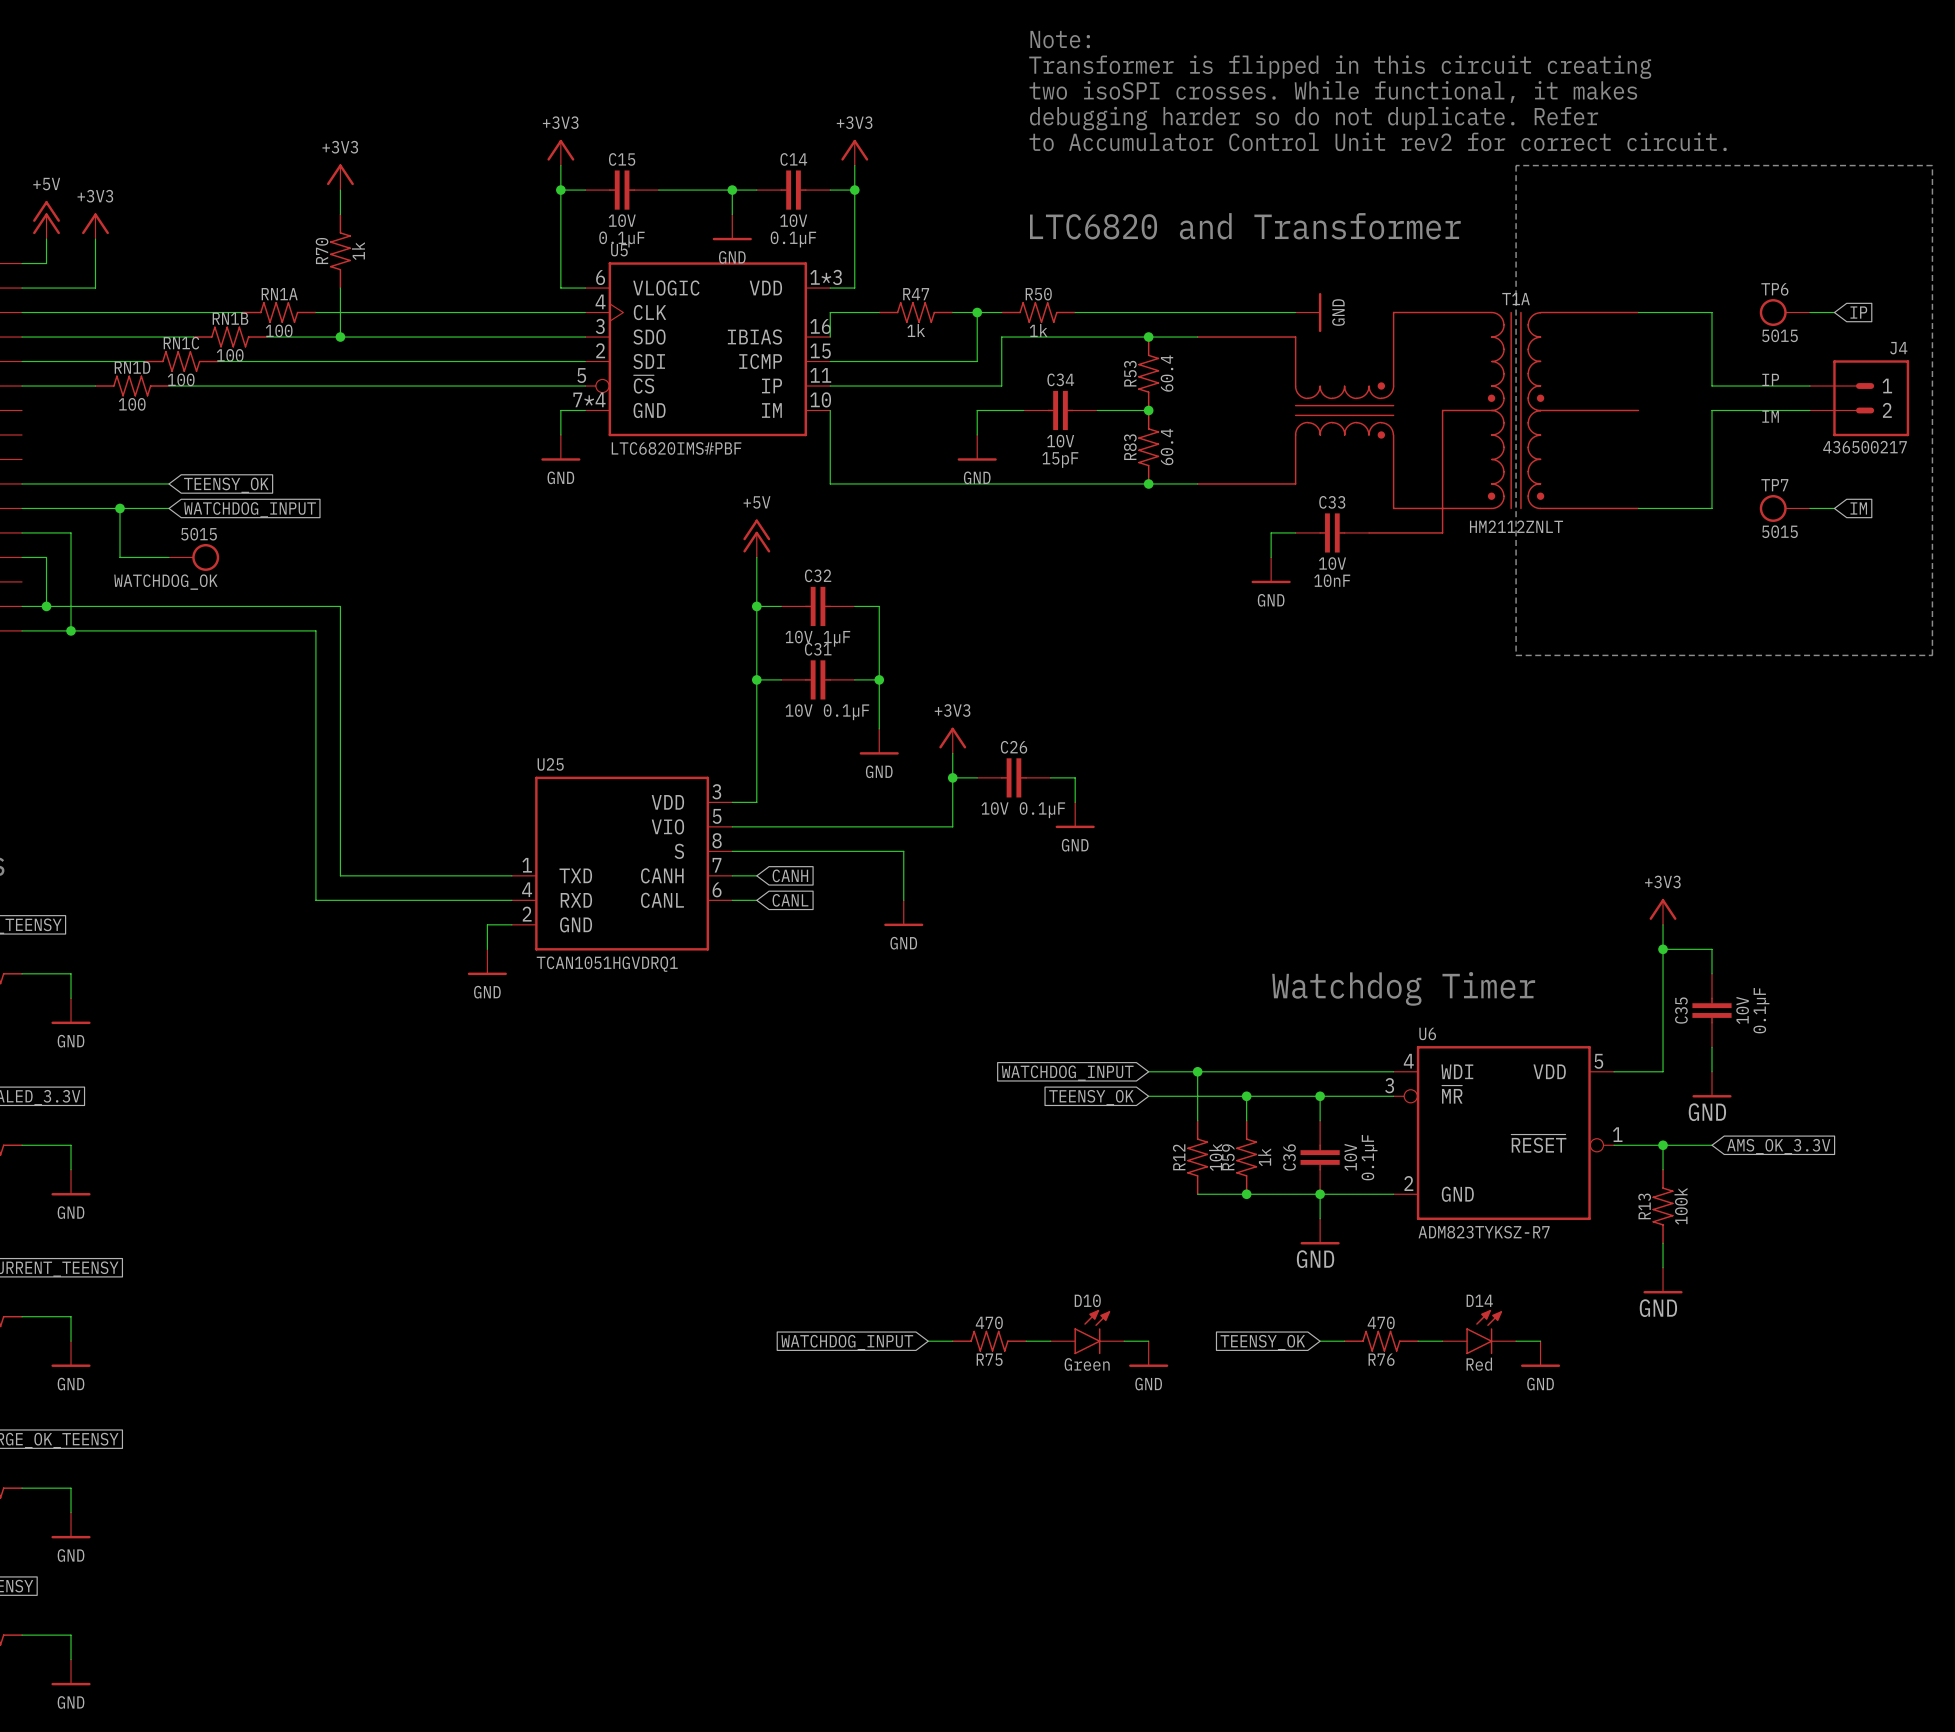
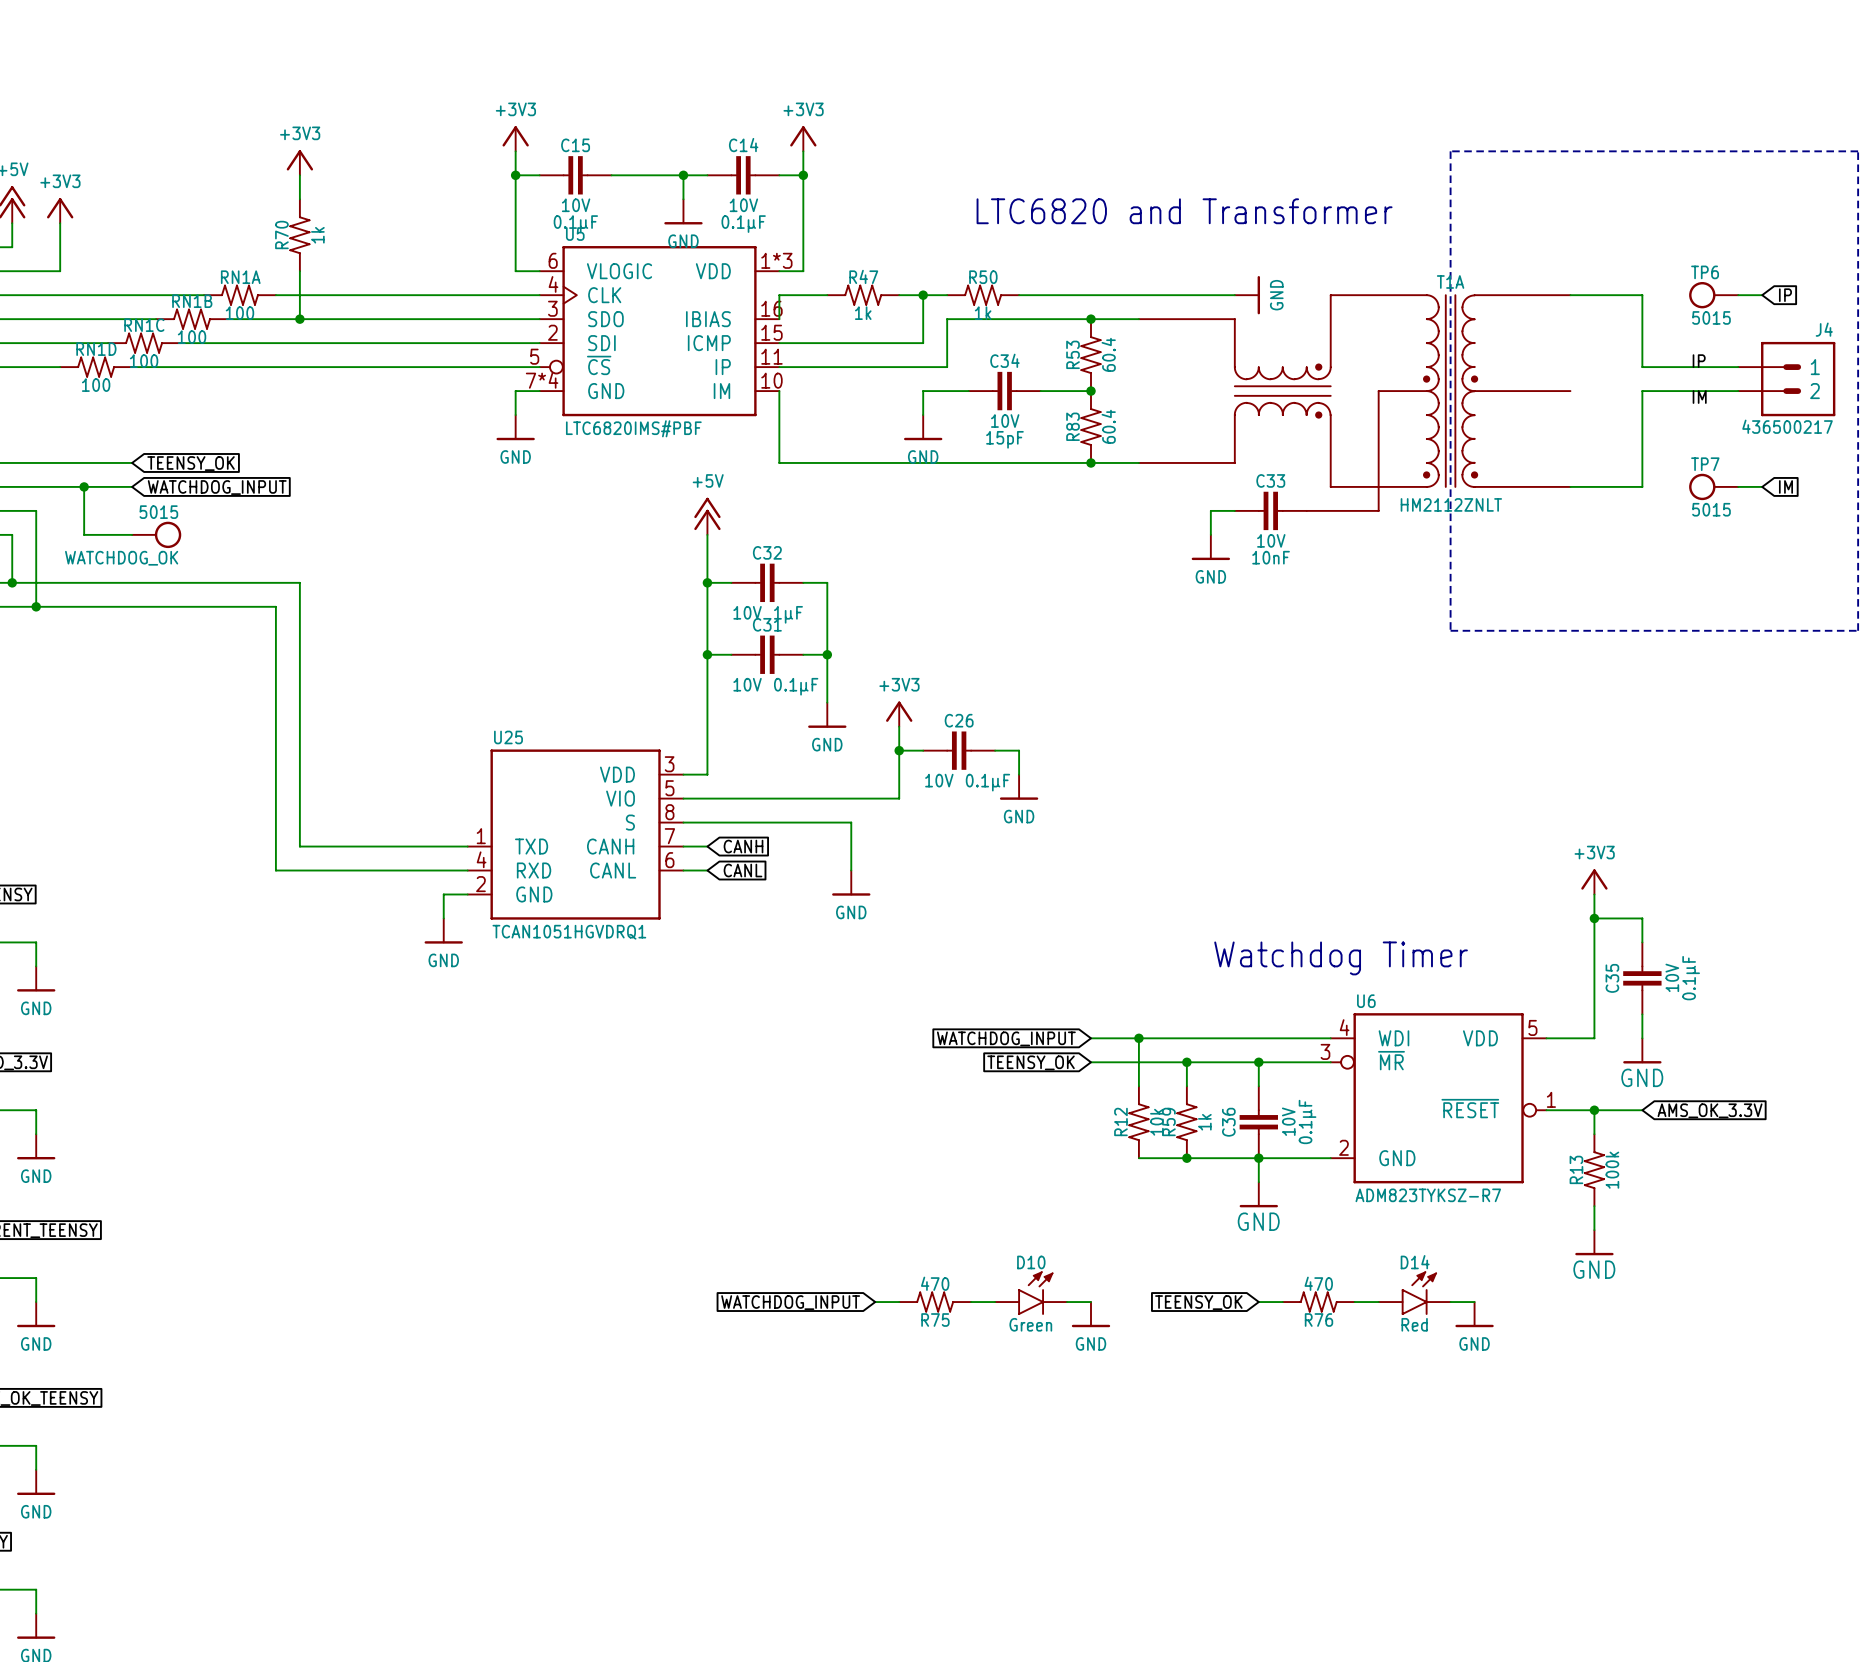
text: Note: (1060, 39) -> none
text: Transformer is flipped in this circuit creating (1340, 67) -> none
text: two isoSPI crosses. While functional, it makes (1333, 91) -> none
text: debugging harder so do not duplicate. Refer (1314, 118) -> none
text: to Accumulator Control Unit rev2 for correct circuit. (1378, 141) -> none

